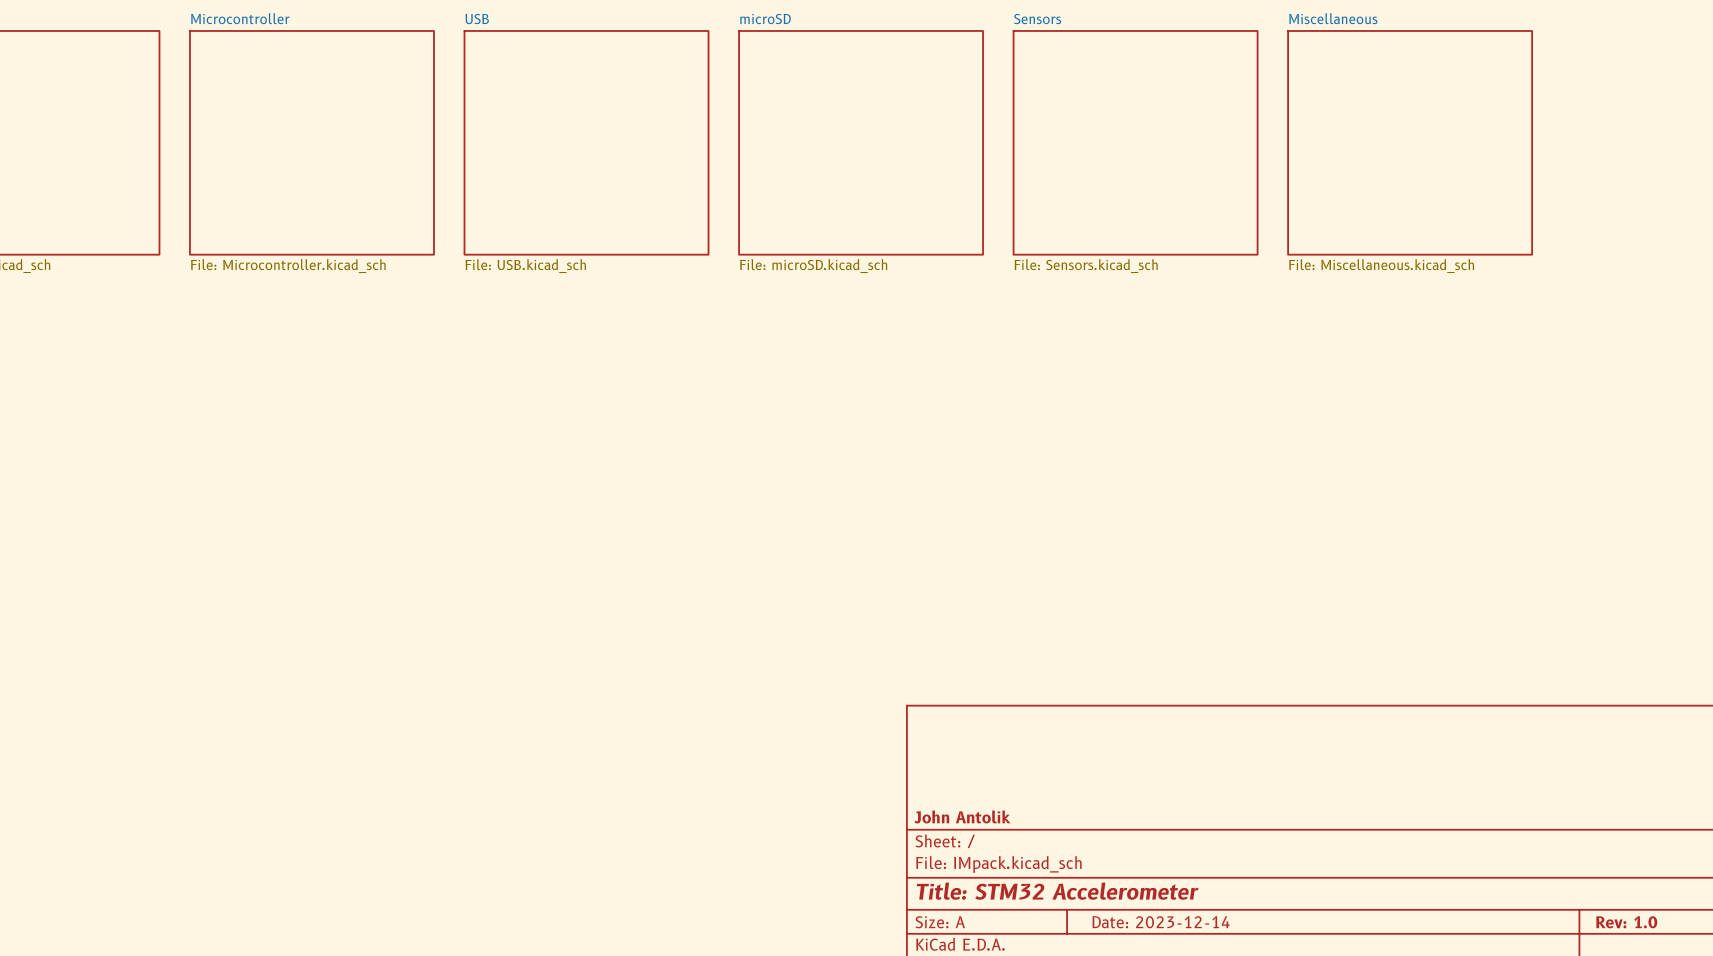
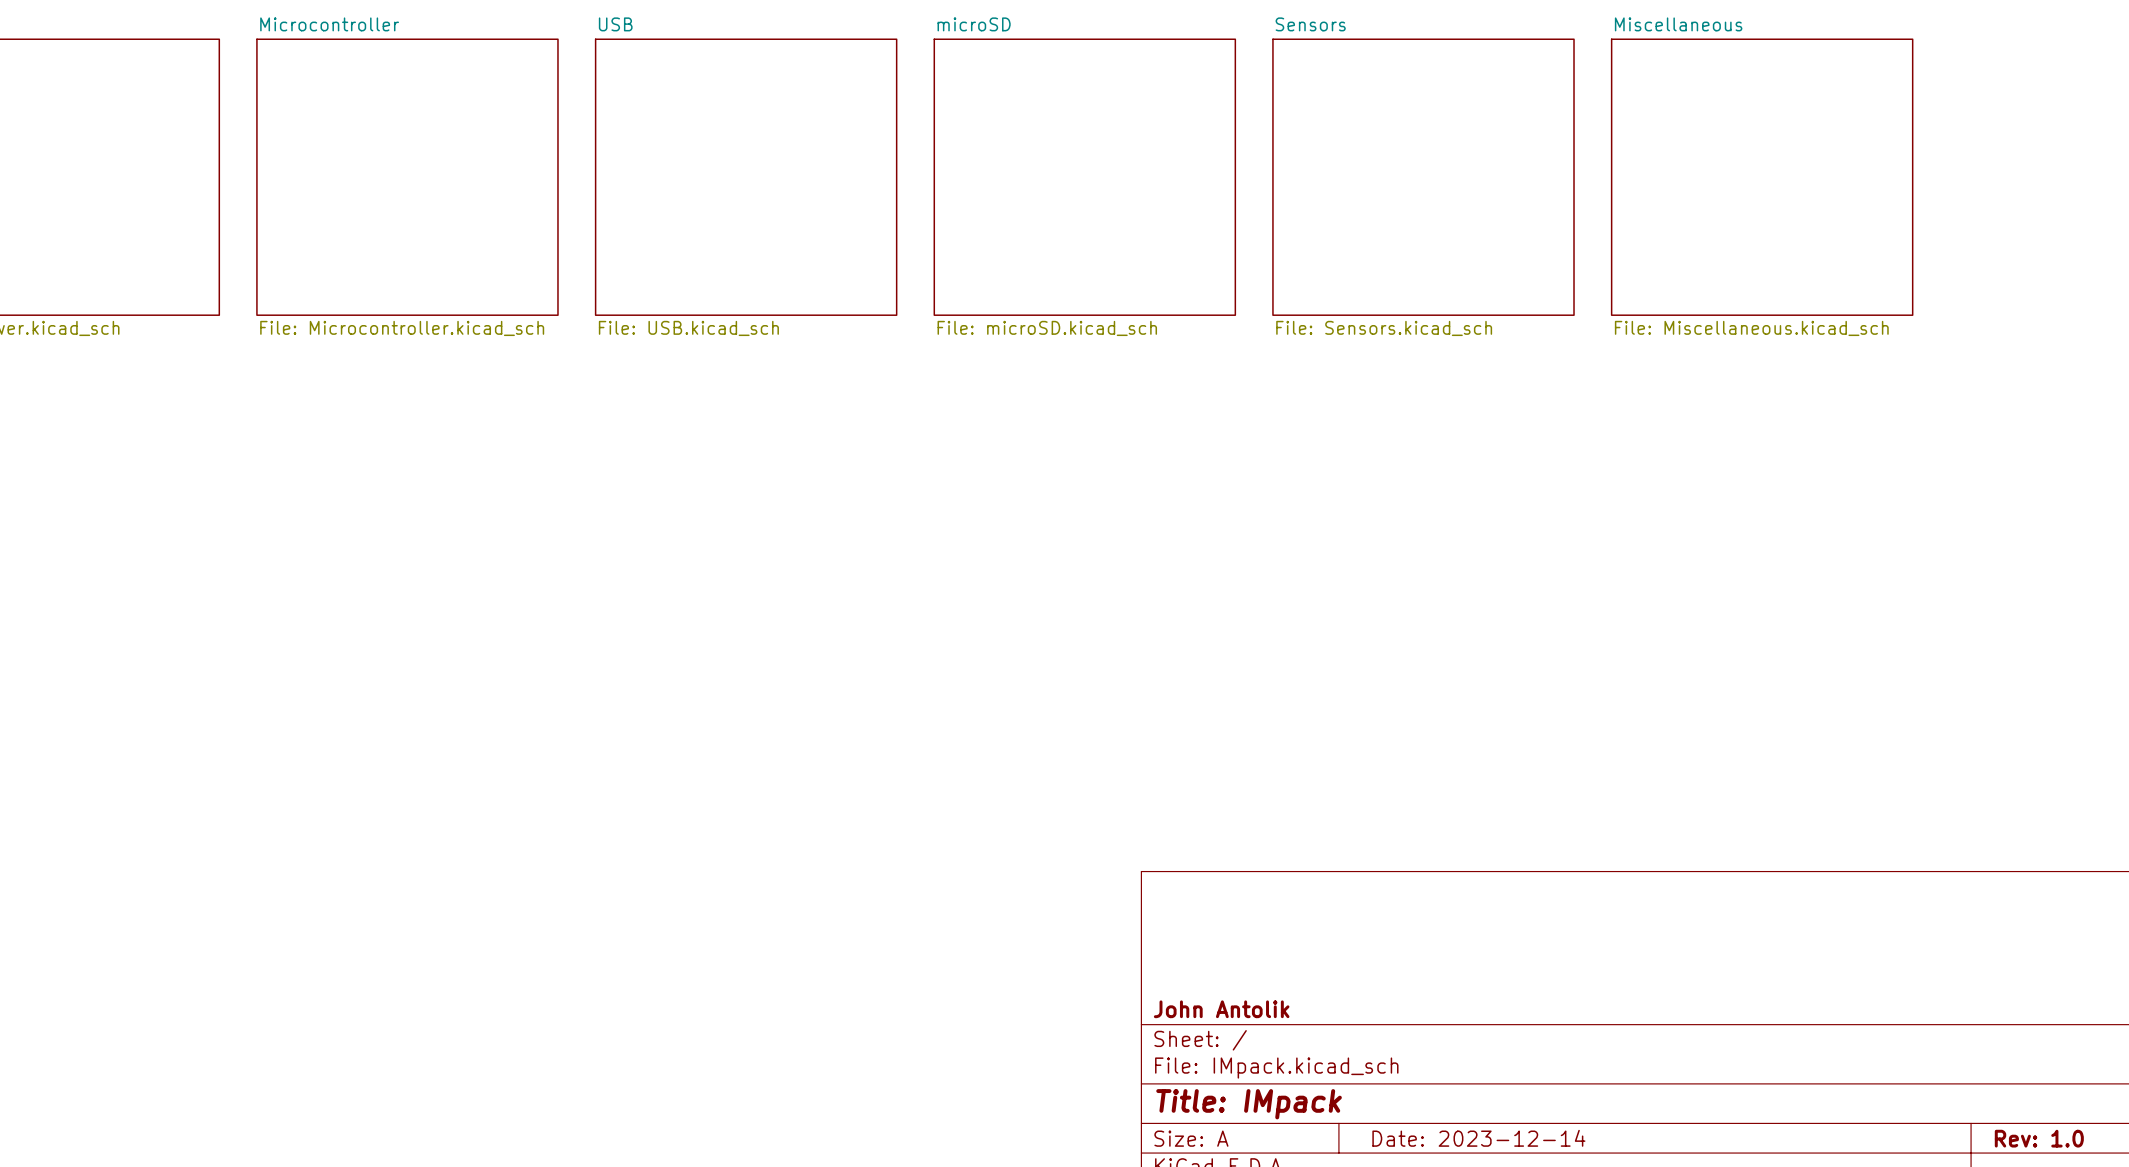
title block: Title: STM32 Accelerometer (1057, 891) -> Title: IMpack (1249, 1104)

